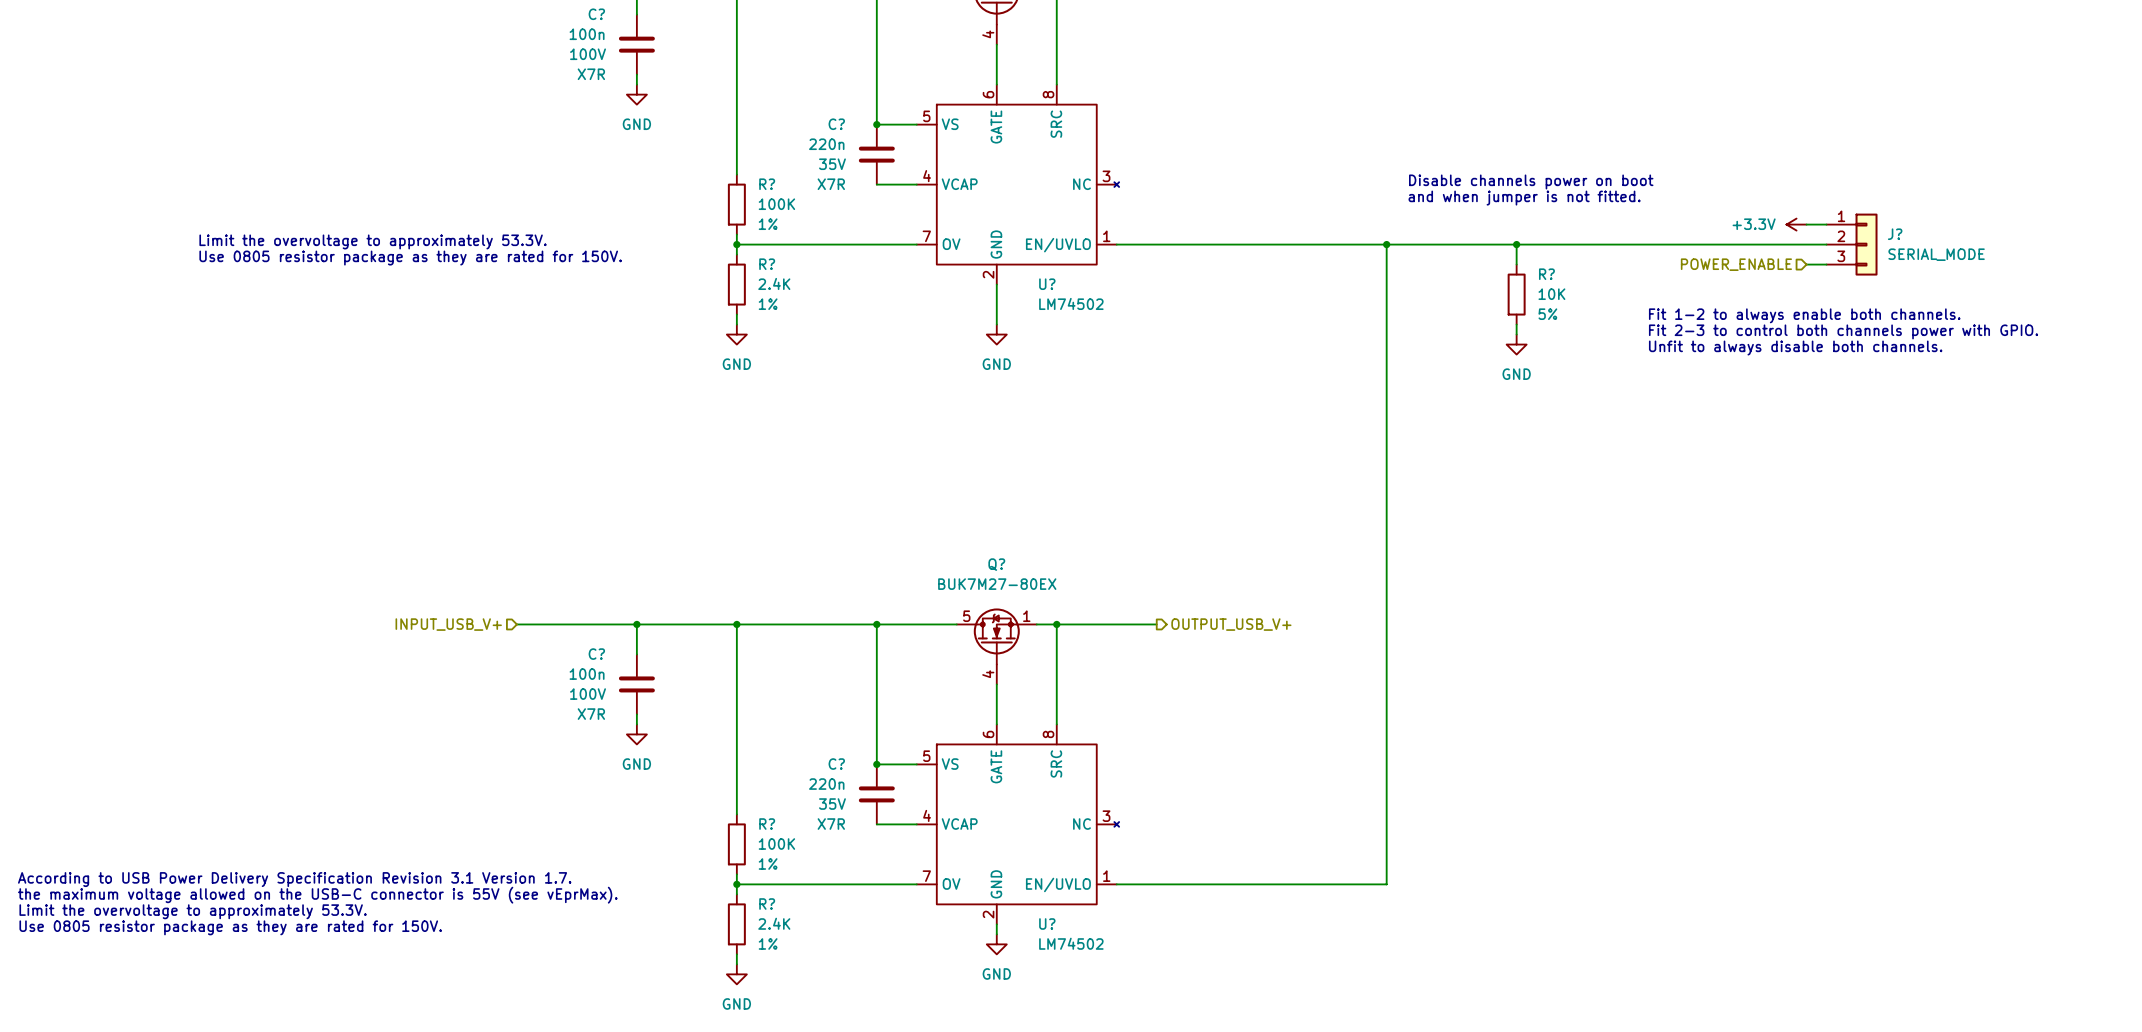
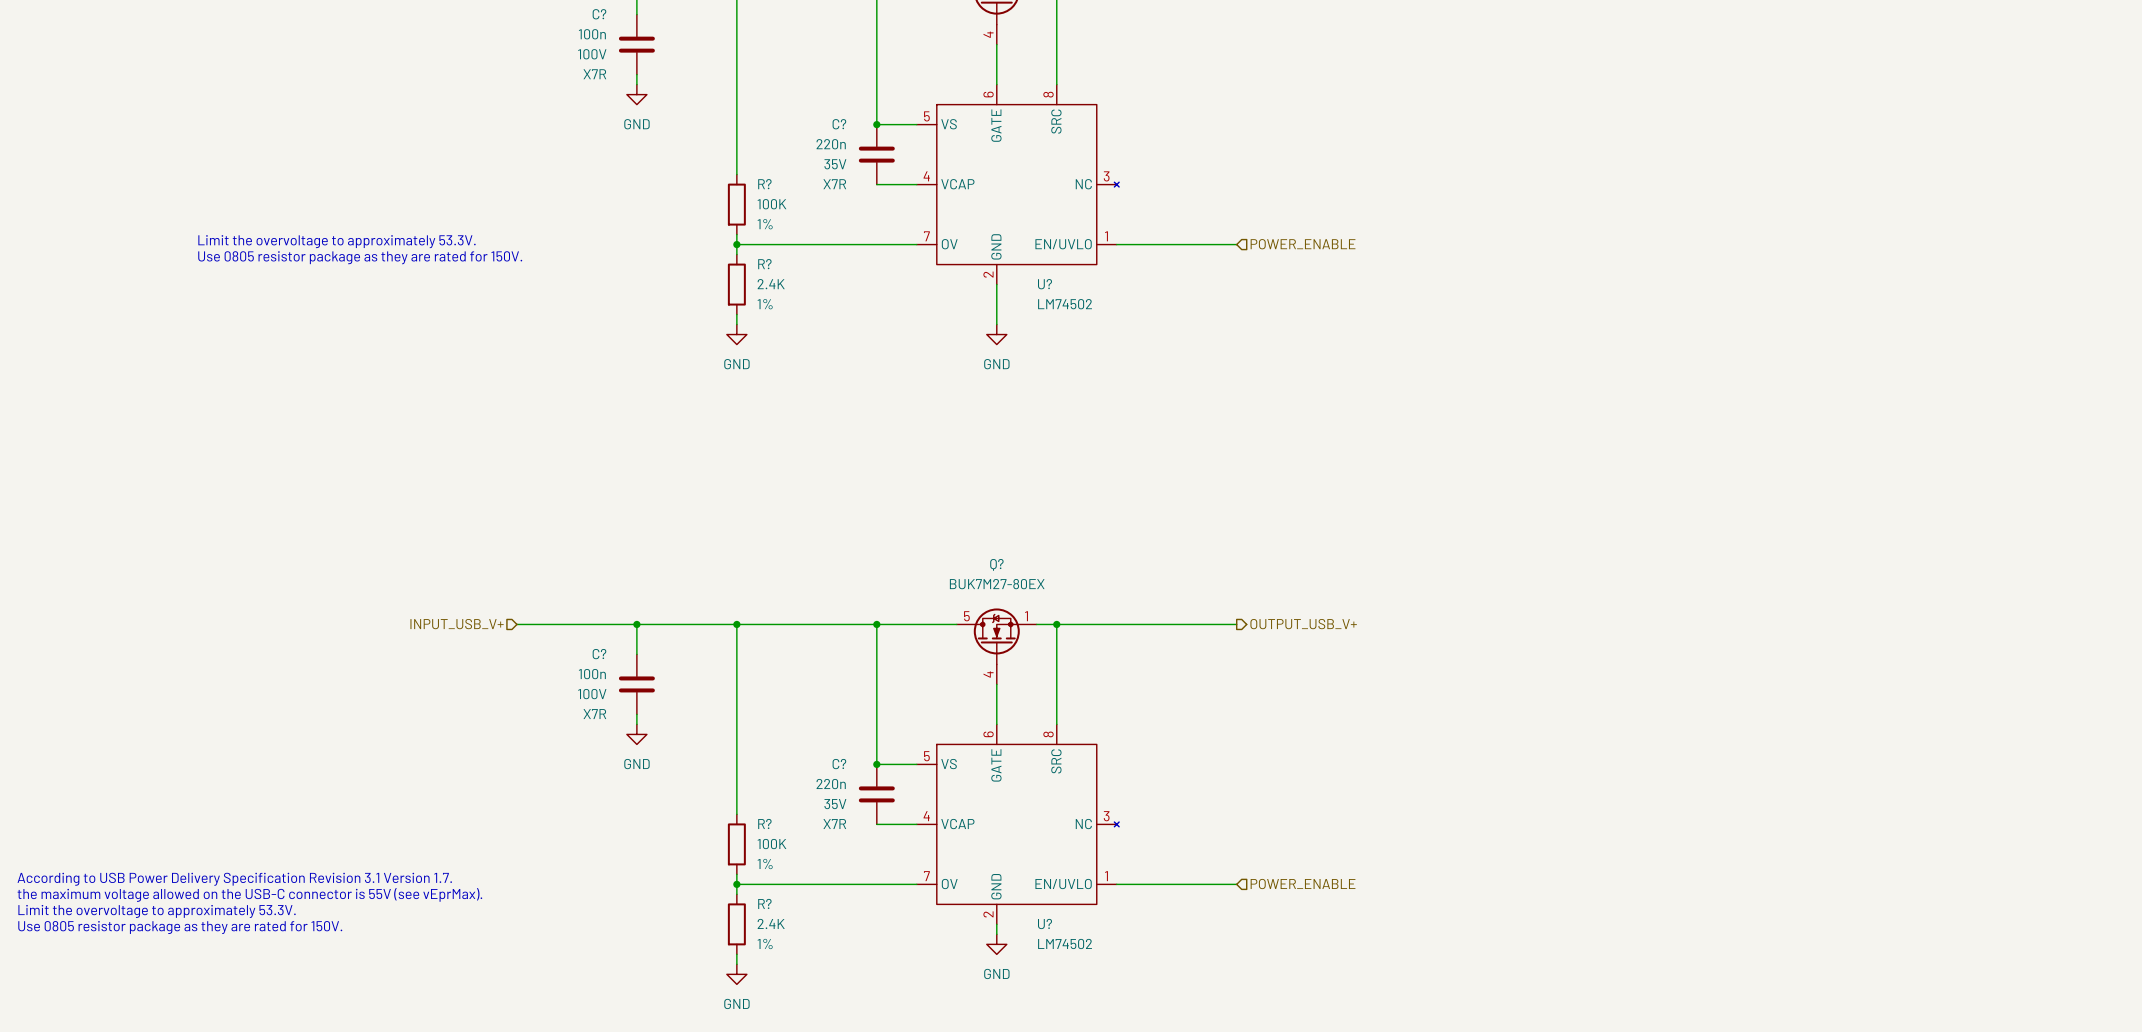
text: Disable channels power on boot (1531, 181) -> none
text: and when jumper is not fitted. (1524, 198) -> none
power symbol: +3.3V (1796, 224) -> none
wire: (1806, 224) (1826, 224) -> none
wire: (1236, 244) (1826, 244) -> none
hierarchical label: none -> POWER_ENABLE (1303, 244)
wire: (1386, 244) (1386, 884) (1236, 884) -> none
junction: (1386, 244) -> none
wire: (1516, 244) (1516, 264) -> none
junction: (1516, 244) -> none
J?: SERIAL_MODE (1852, 244) -> none
hierarchical label: POWER_ENABLE (1736, 264) -> none
wire: (1806, 264) (1826, 264) -> none
R?: 10K (1516, 294) -> none
text: Fit 1-2 to always enable both channels. (1804, 315) -> none
wire: (1516, 324) (1516, 334) -> none
text: Fit 2-3 to control both channels power with GPIO. (1843, 331) -> none
power symbol: GND (1516, 344) -> none
text: Unfit to always disable both channels. (1795, 348) -> none
wire: none -> (1156, 624) (1236, 624)
hierarchical label position: OUTPUT_USB_V+ (1231, 624) -> OUTPUT_USB_V+ (1303, 624)
hierarchical label: none -> POWER_ENABLE (1303, 884)

